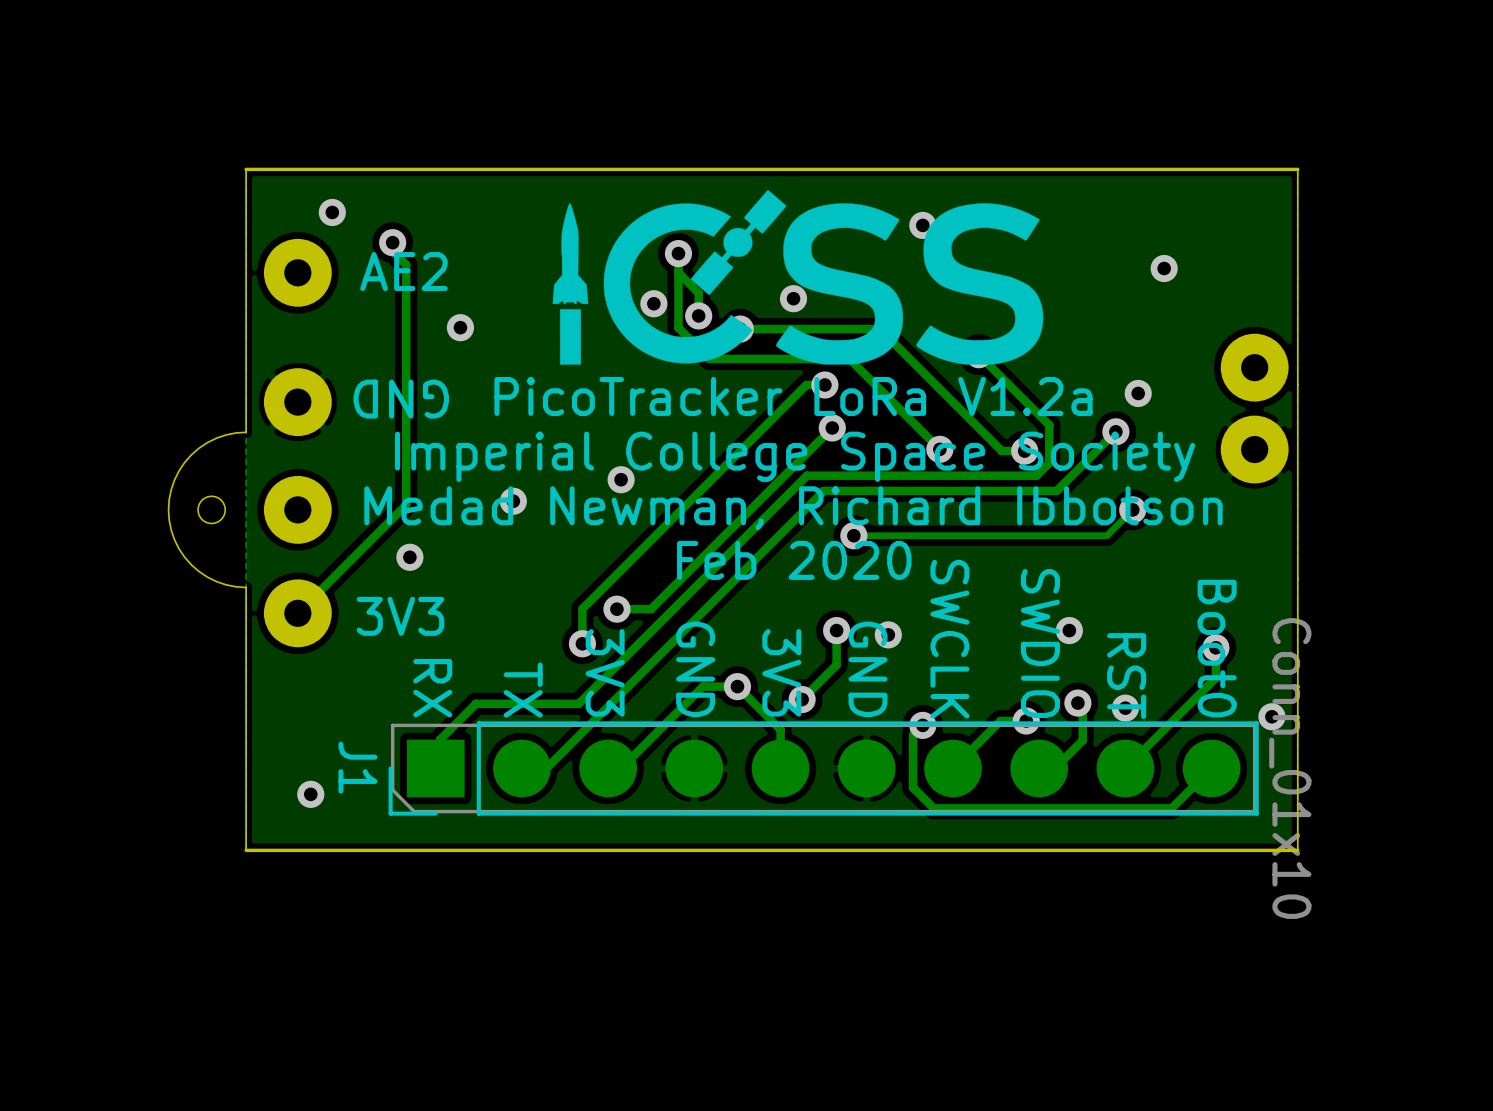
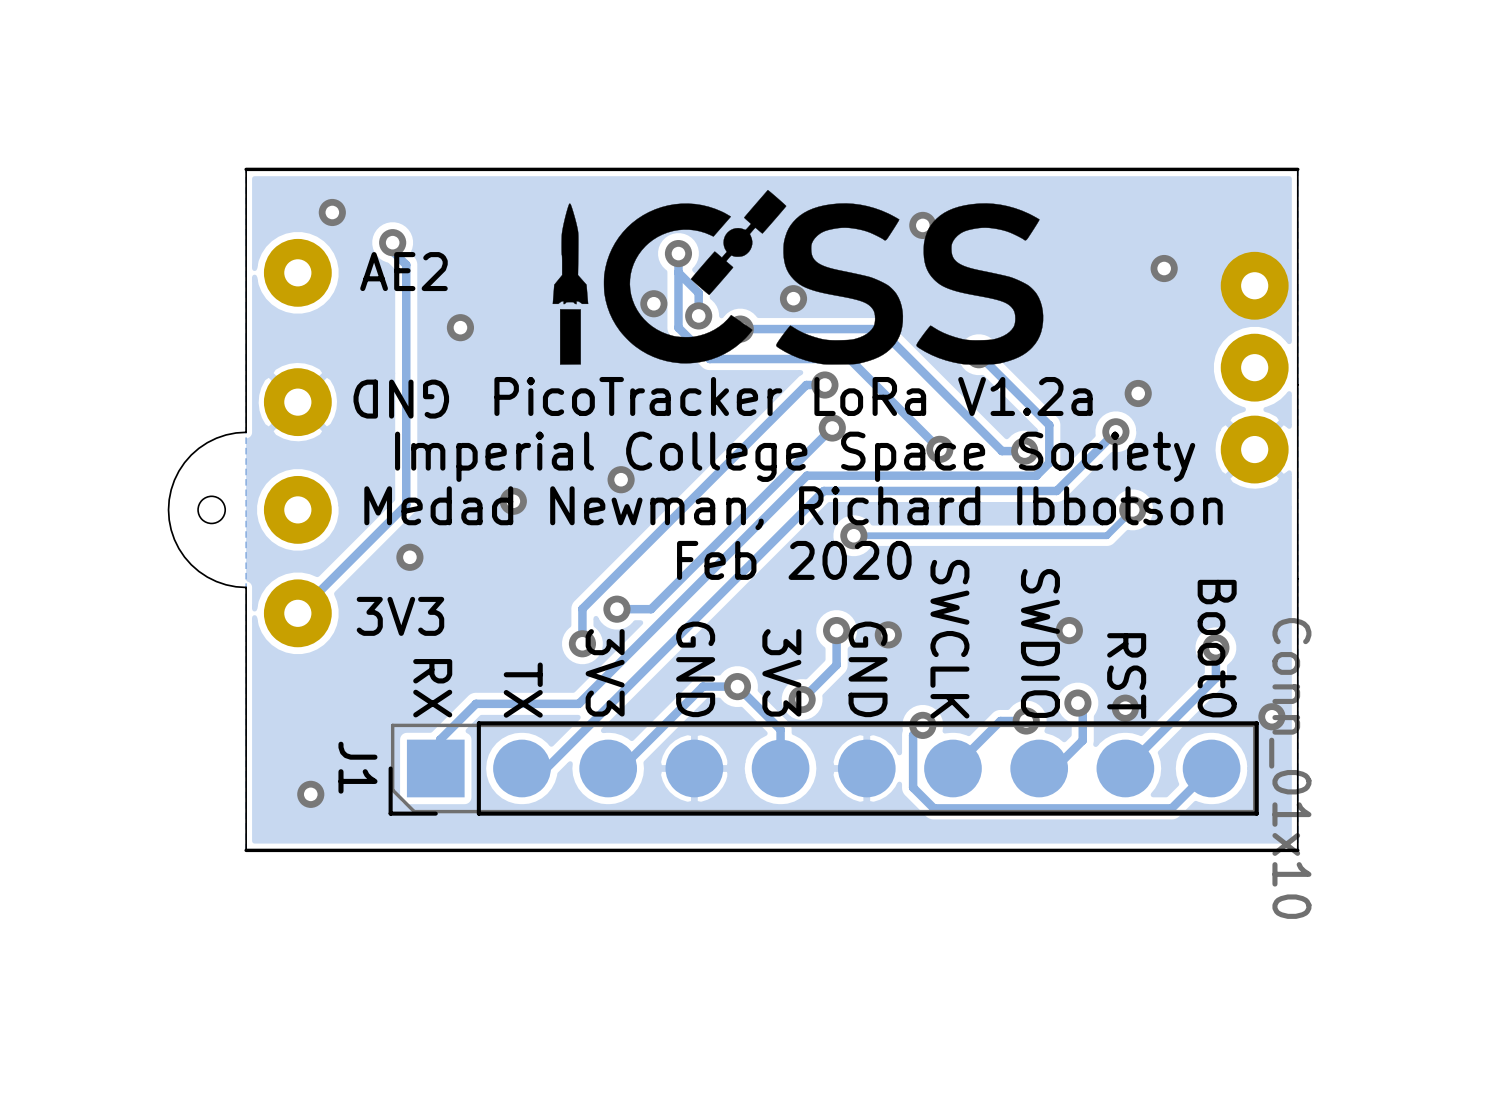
part: none -> (1254, 285)

